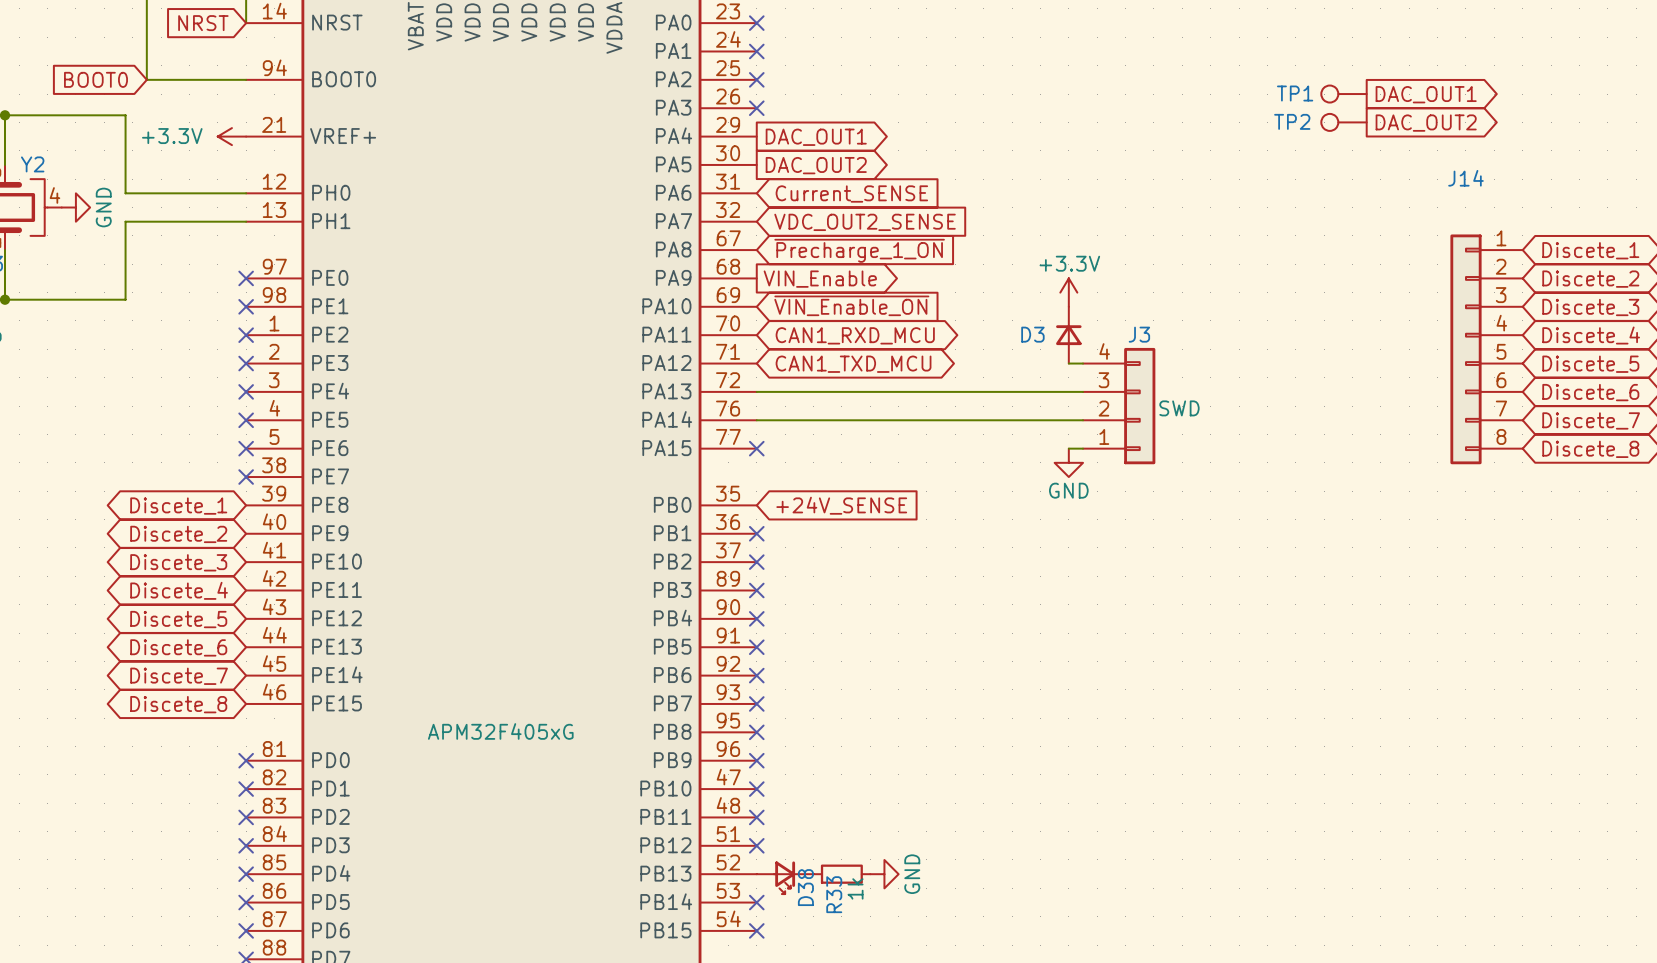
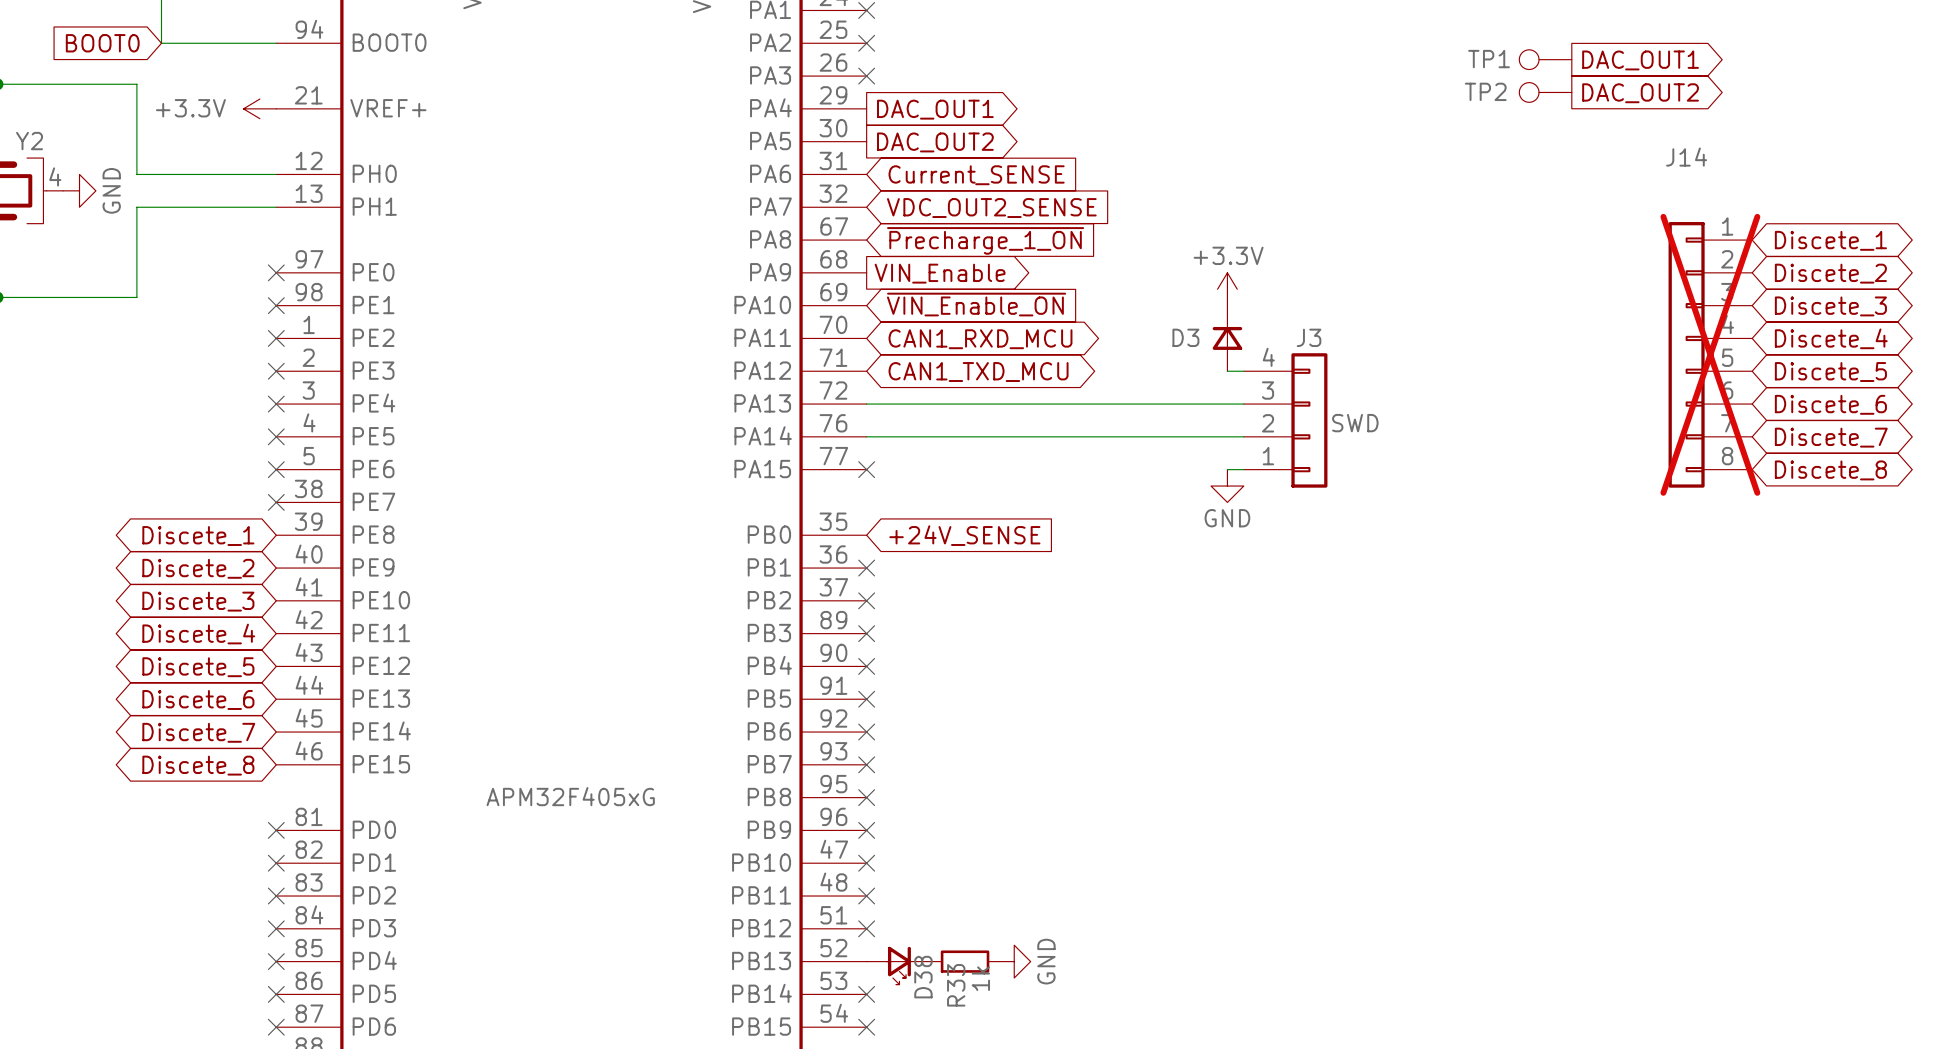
J14 do-not-place cross: none -> (1710, 354)

